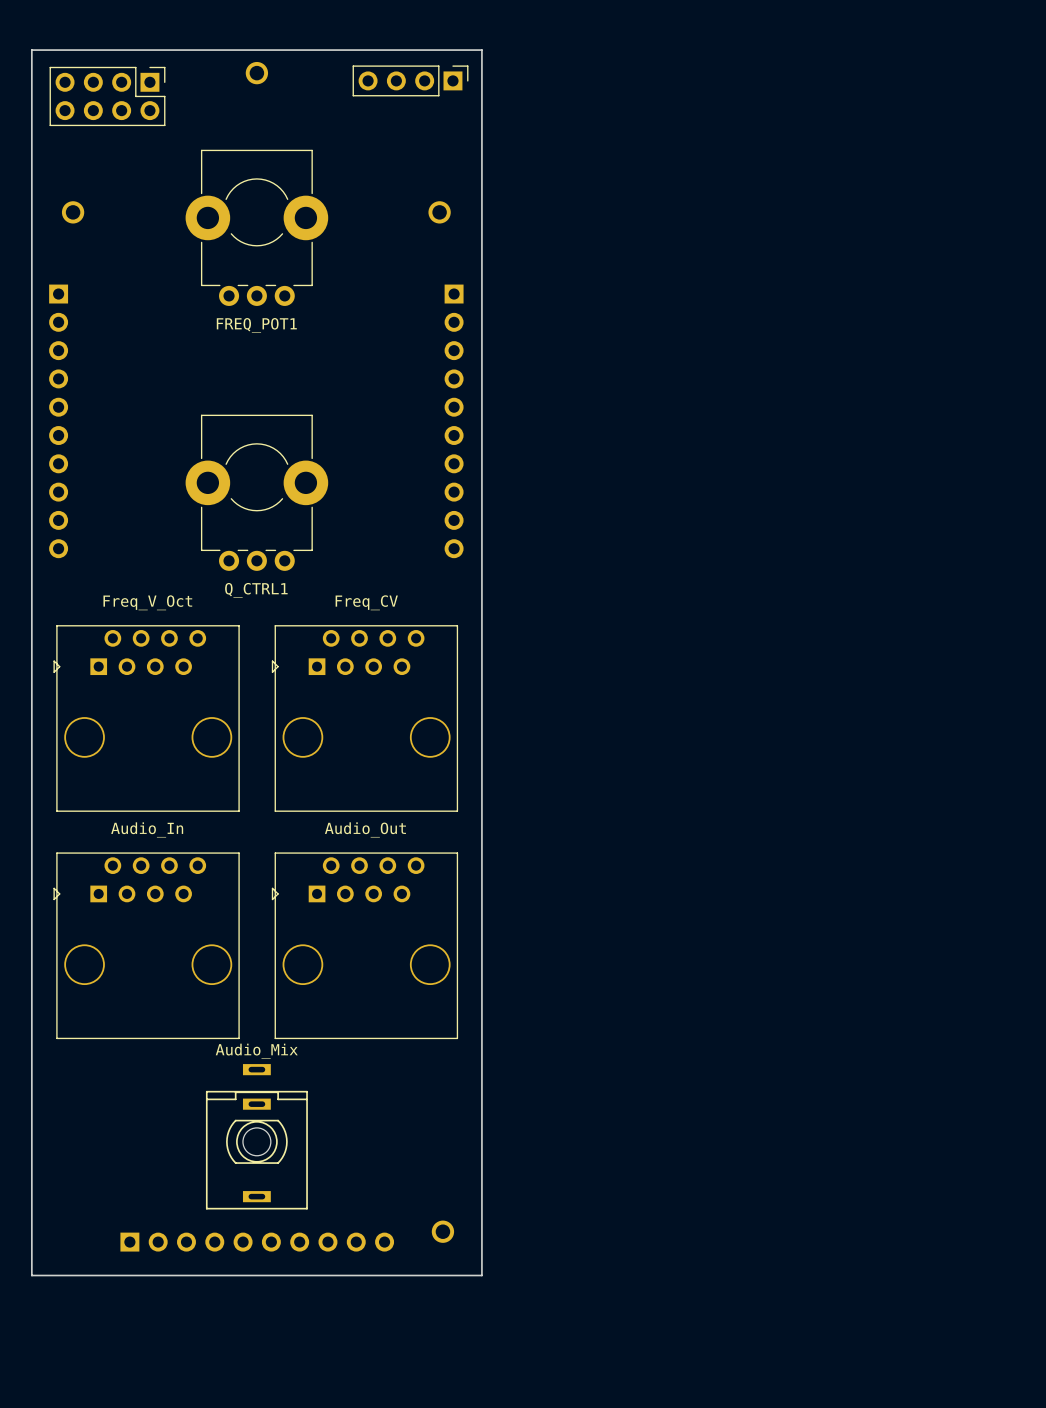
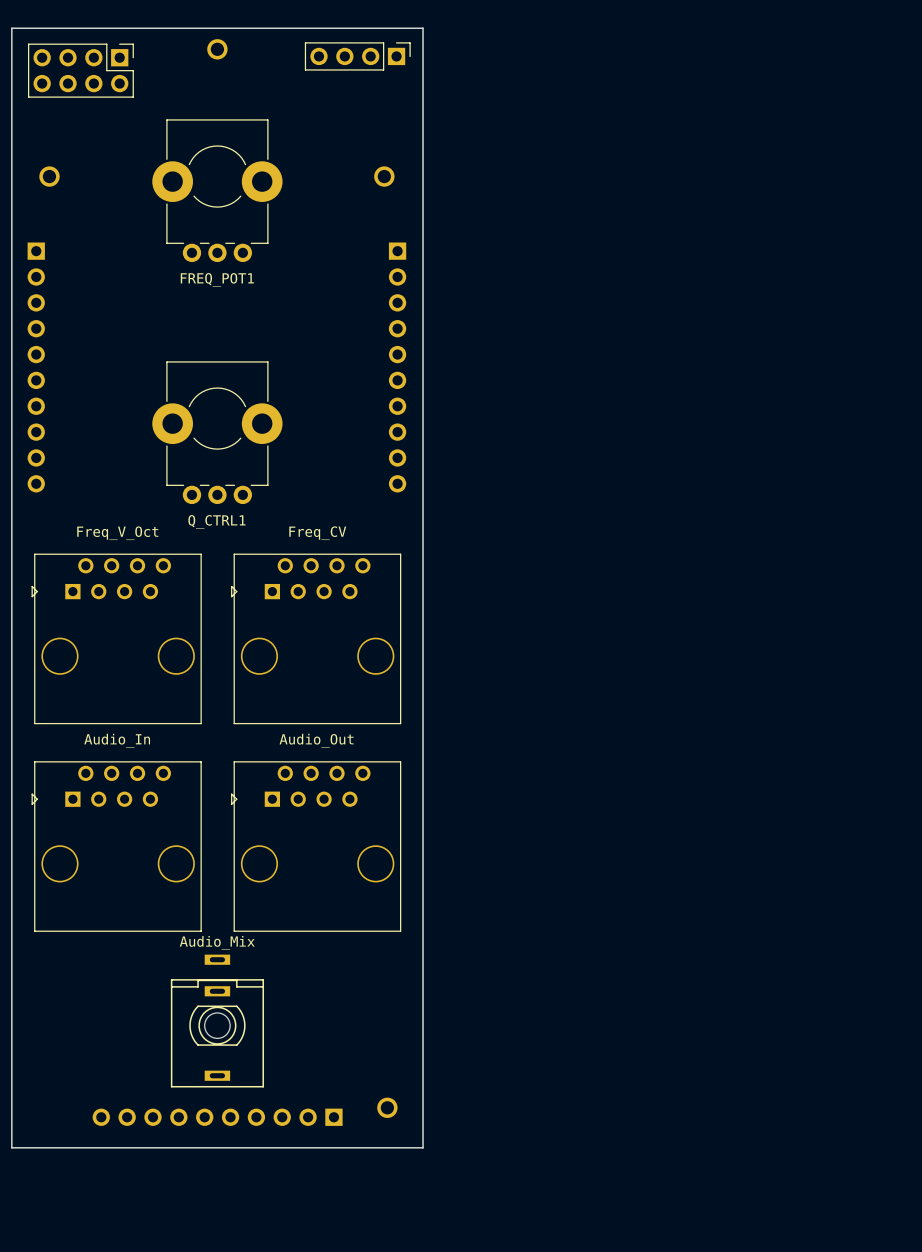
part rotation: 0° (257, 1242) -> 180° (217, 1117)

